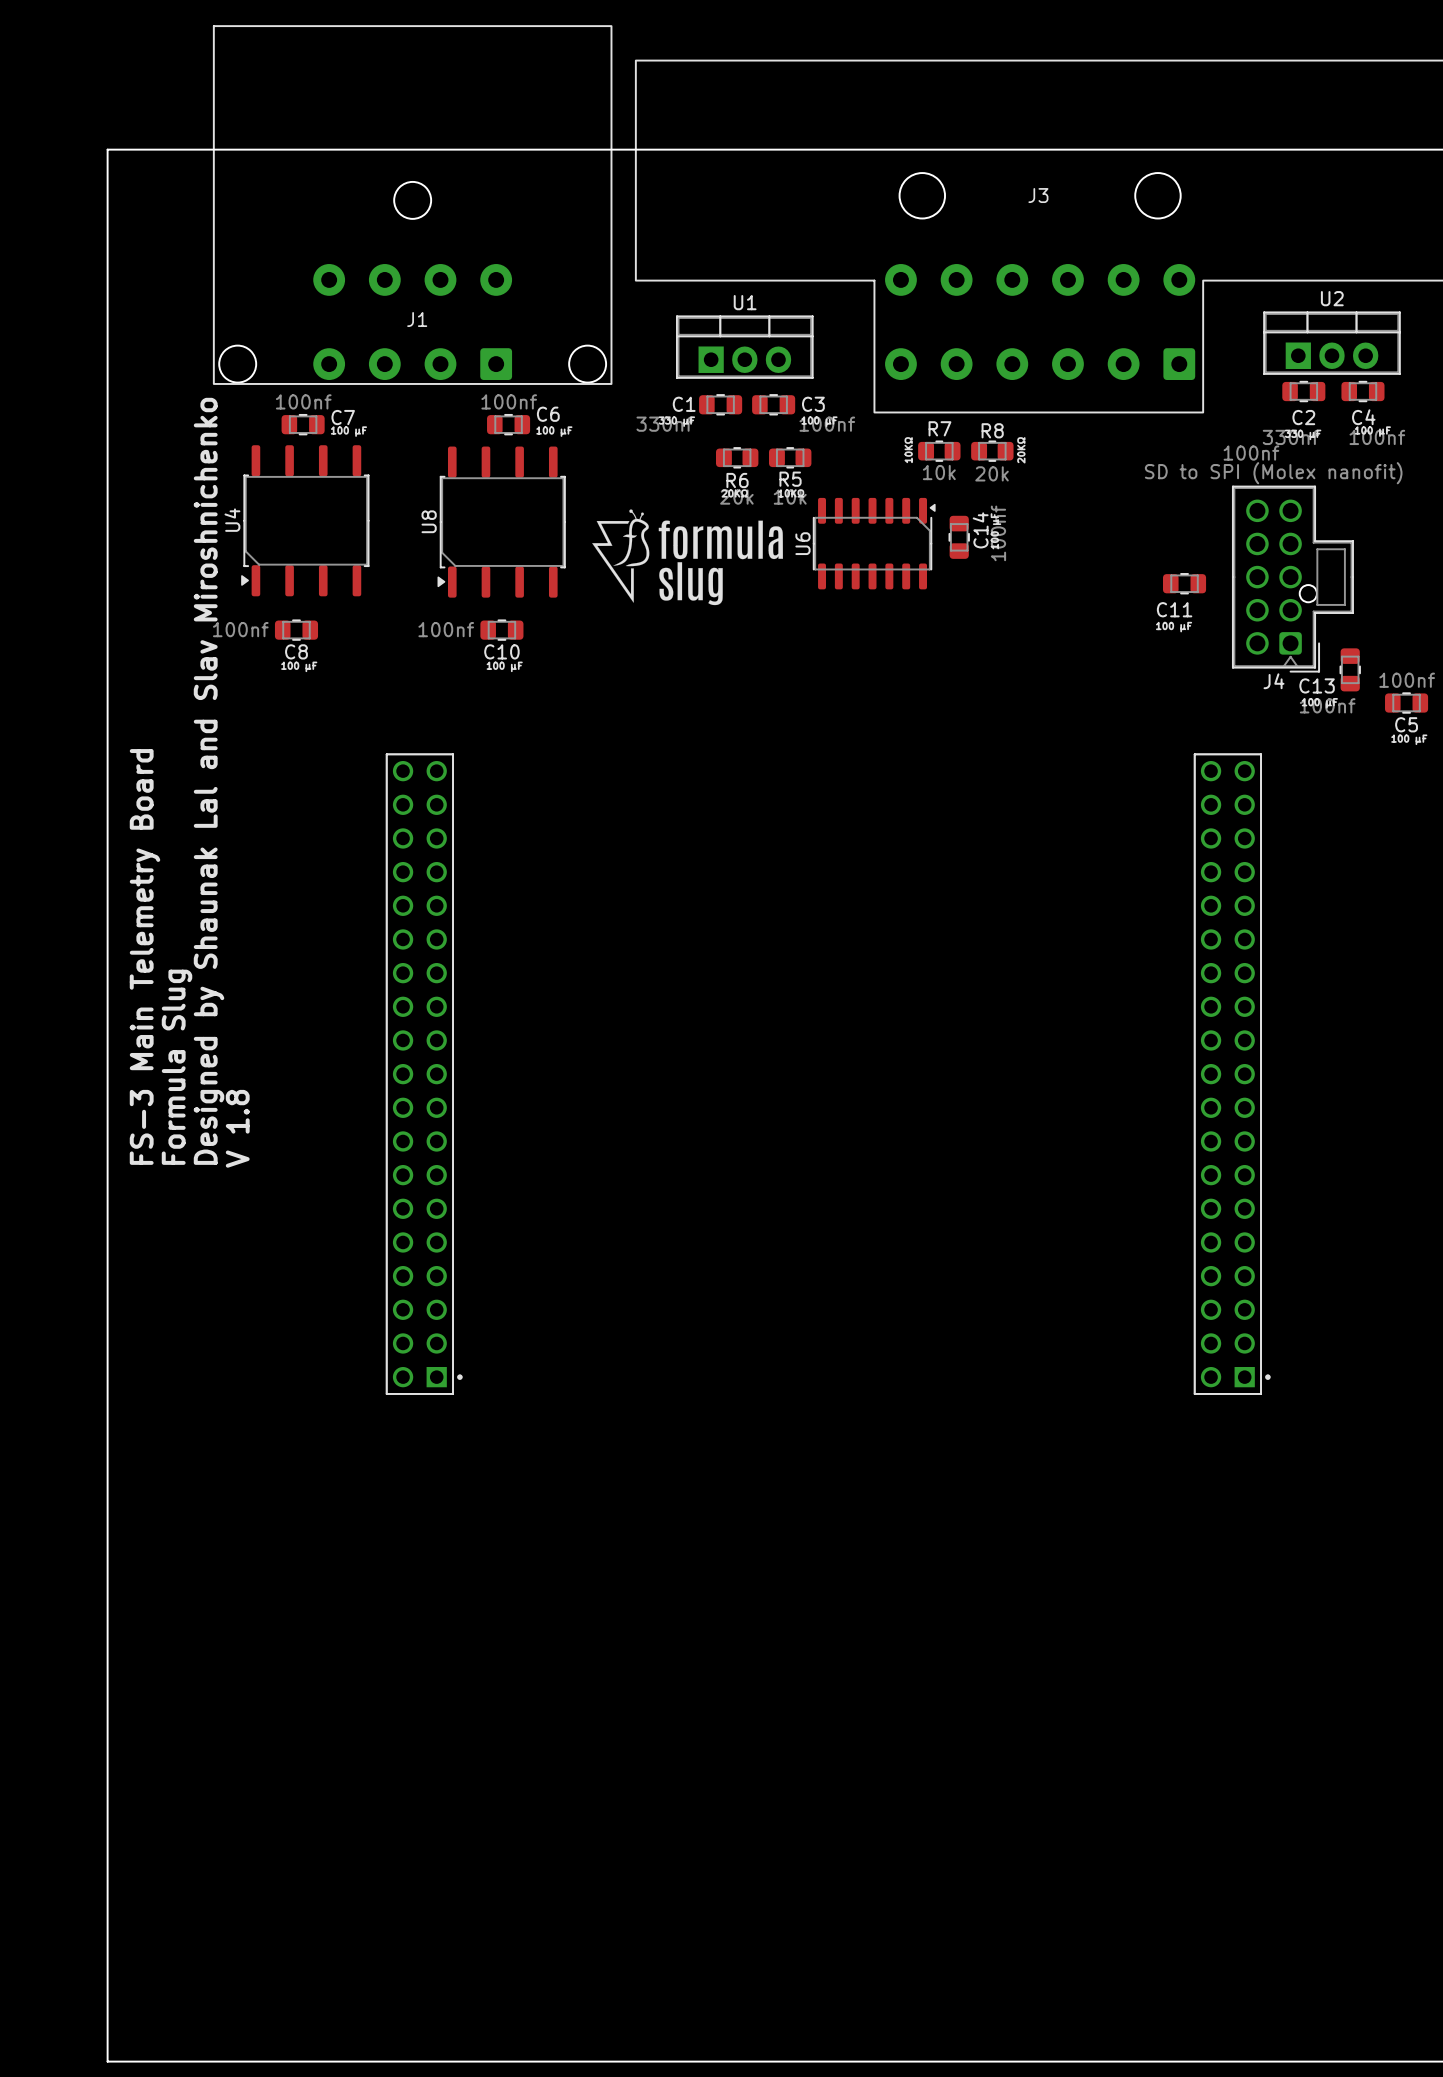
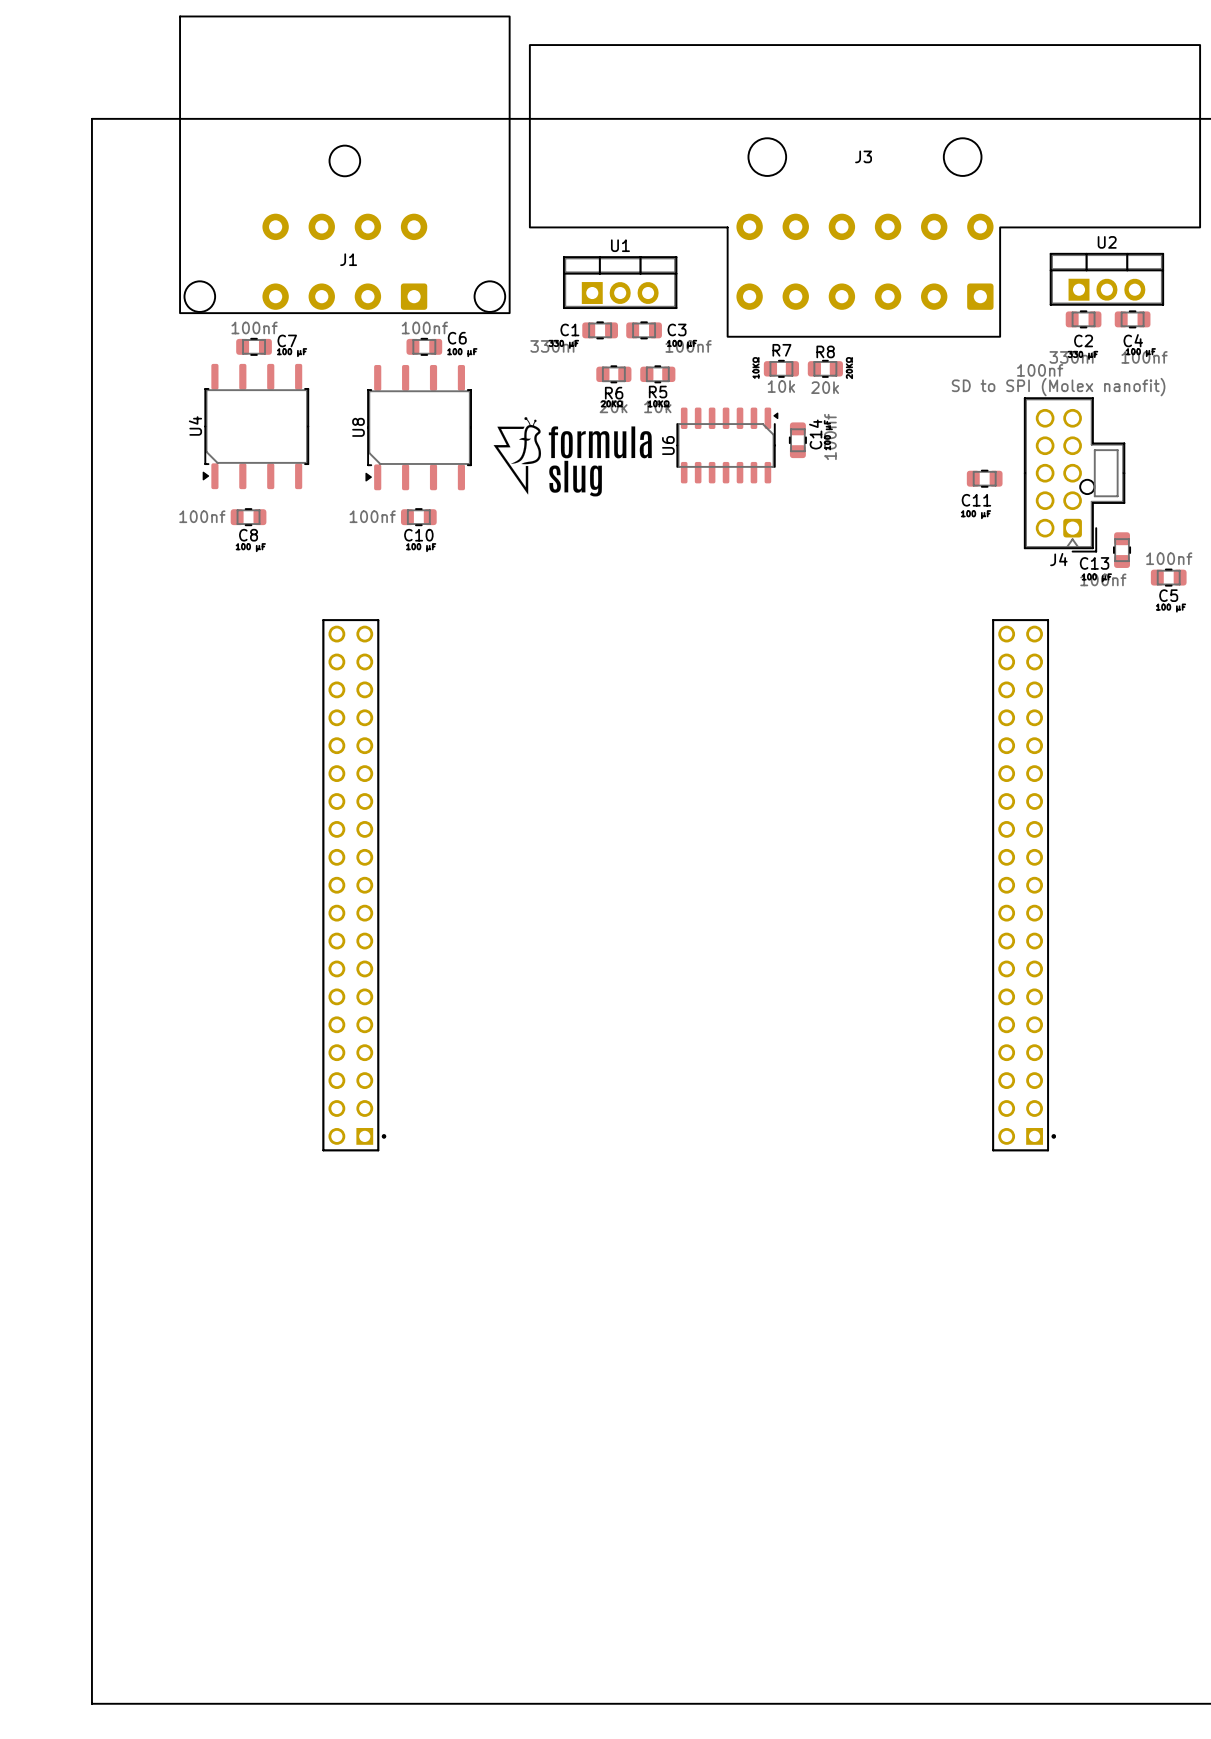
text: Designed by Shaunak Lal and Slav Miroshnichenko (209, 781) -> none
text: FS-3 Main Telemetry Board (145, 956) -> none
text: Formula Slug (177, 1067) -> none
text: V 1.8 (237, 1128) -> none

